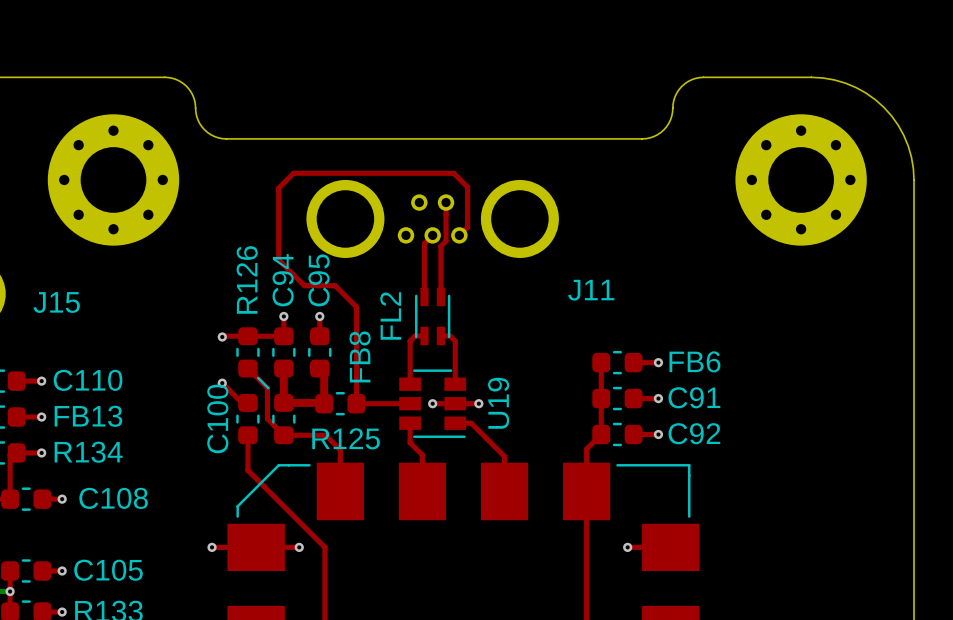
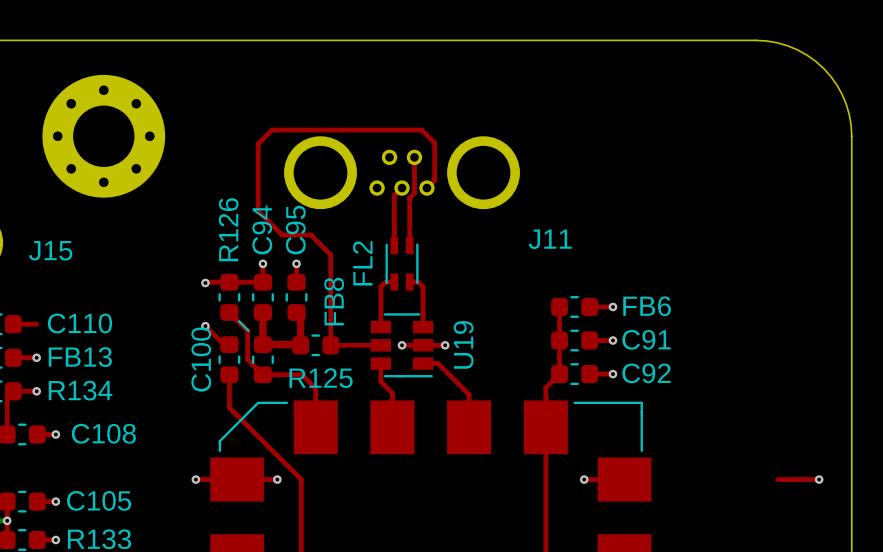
board edge: (164, 77) (176, 79) (186, 86) (193, 96) (196, 116) (201, 126) (211, 134) (226, 138) (646, 138) (657, 134) (666, 126) (671, 116) (675, 96) (681, 86) (691, 79) (703, 77) -> (151, 40) (655, 40)
part: (801, 179) -> none
via: (41, 381) -> none
top track: none -> (777, 479) (819, 479)
via: none -> (819, 479)

